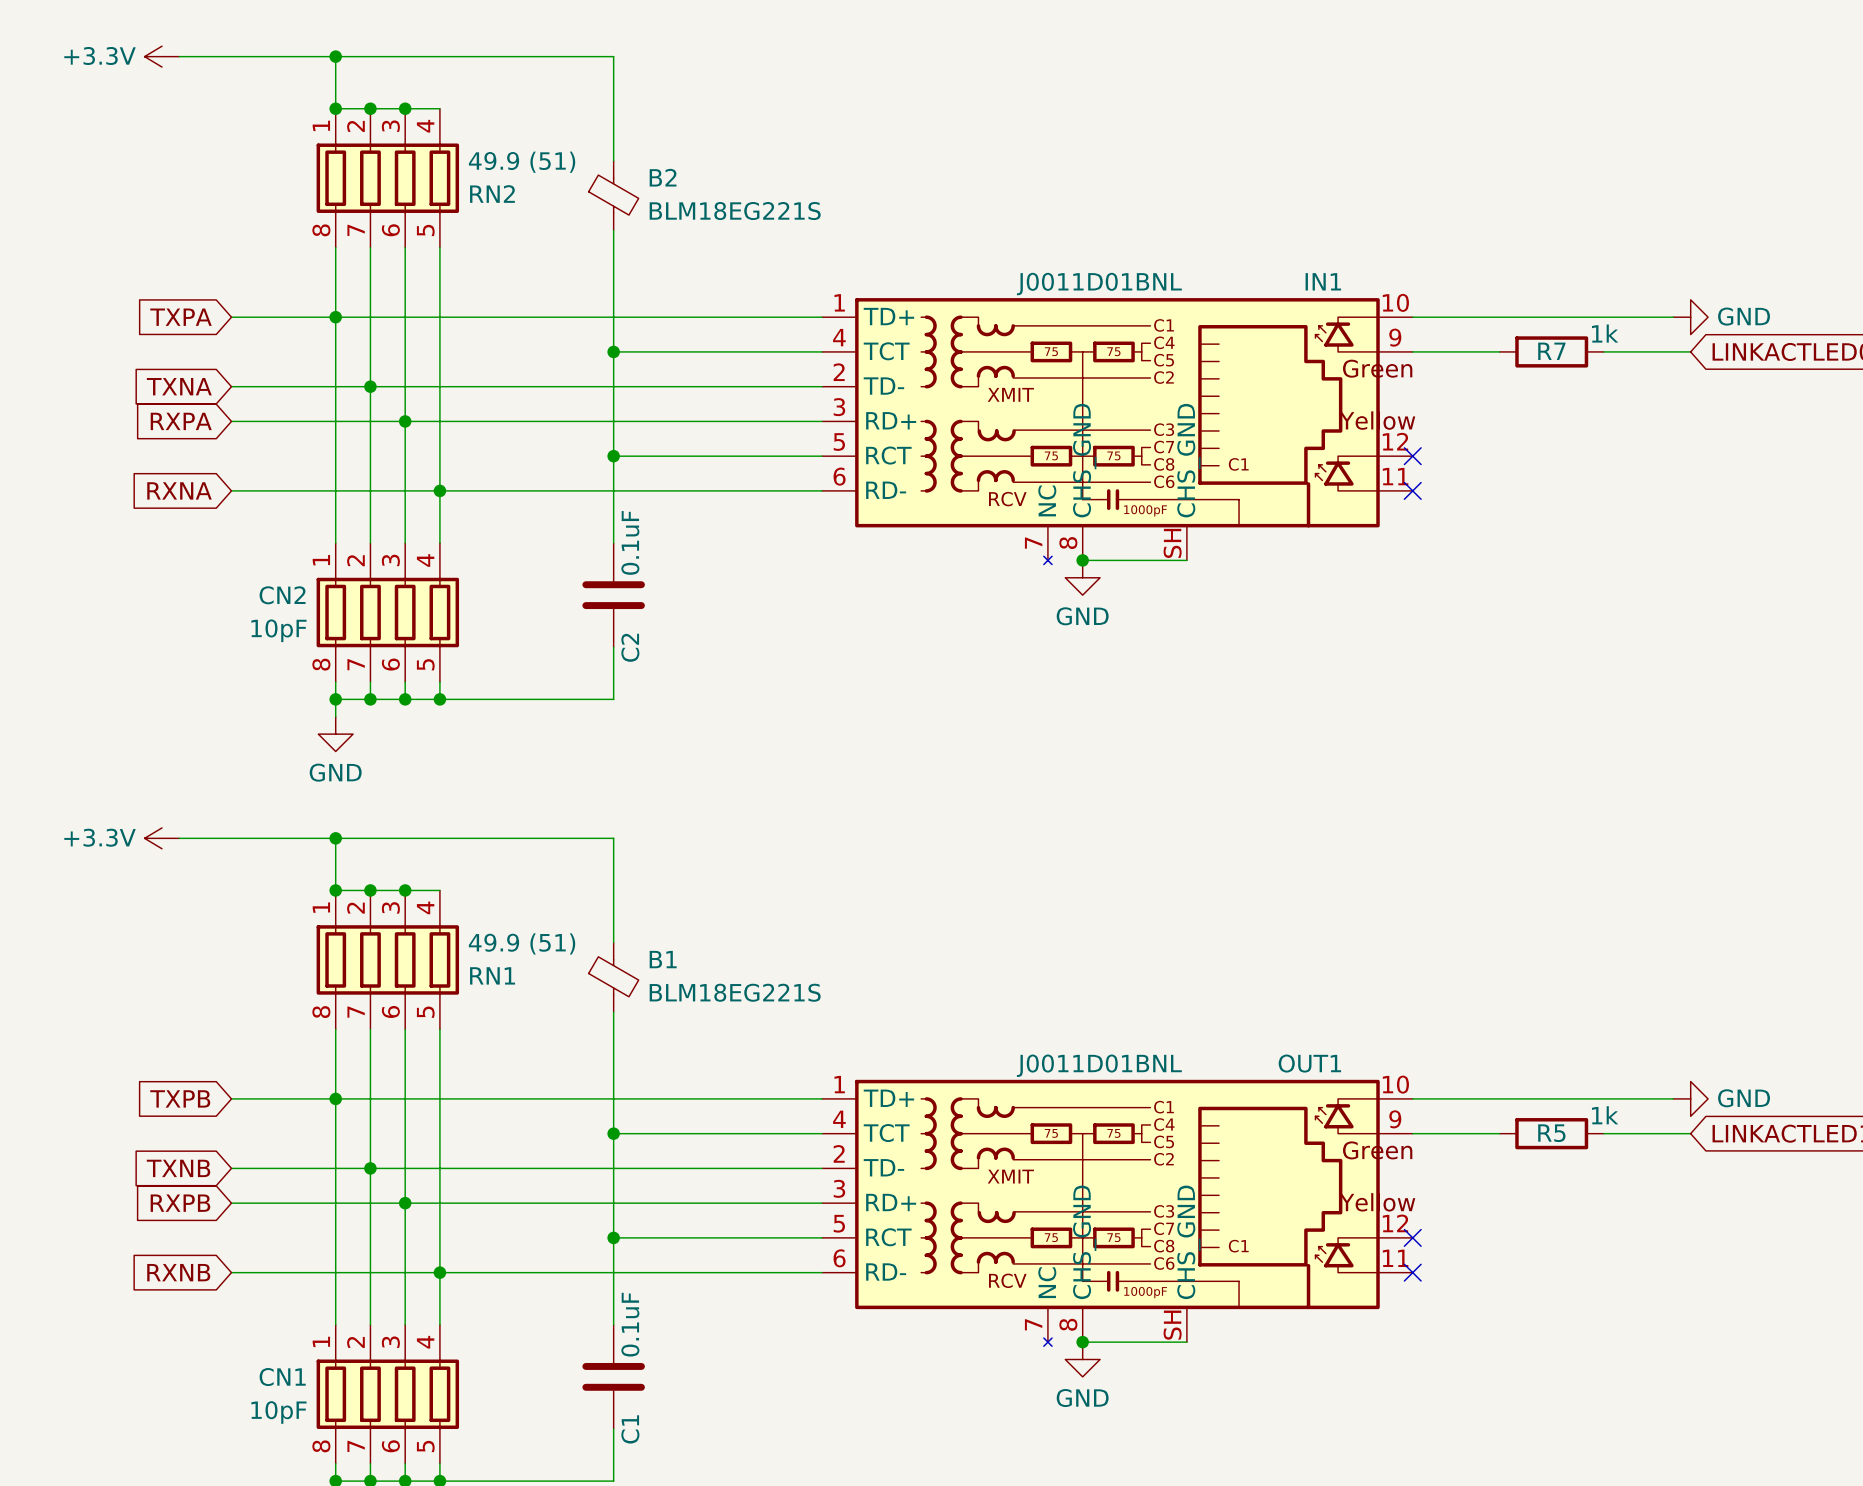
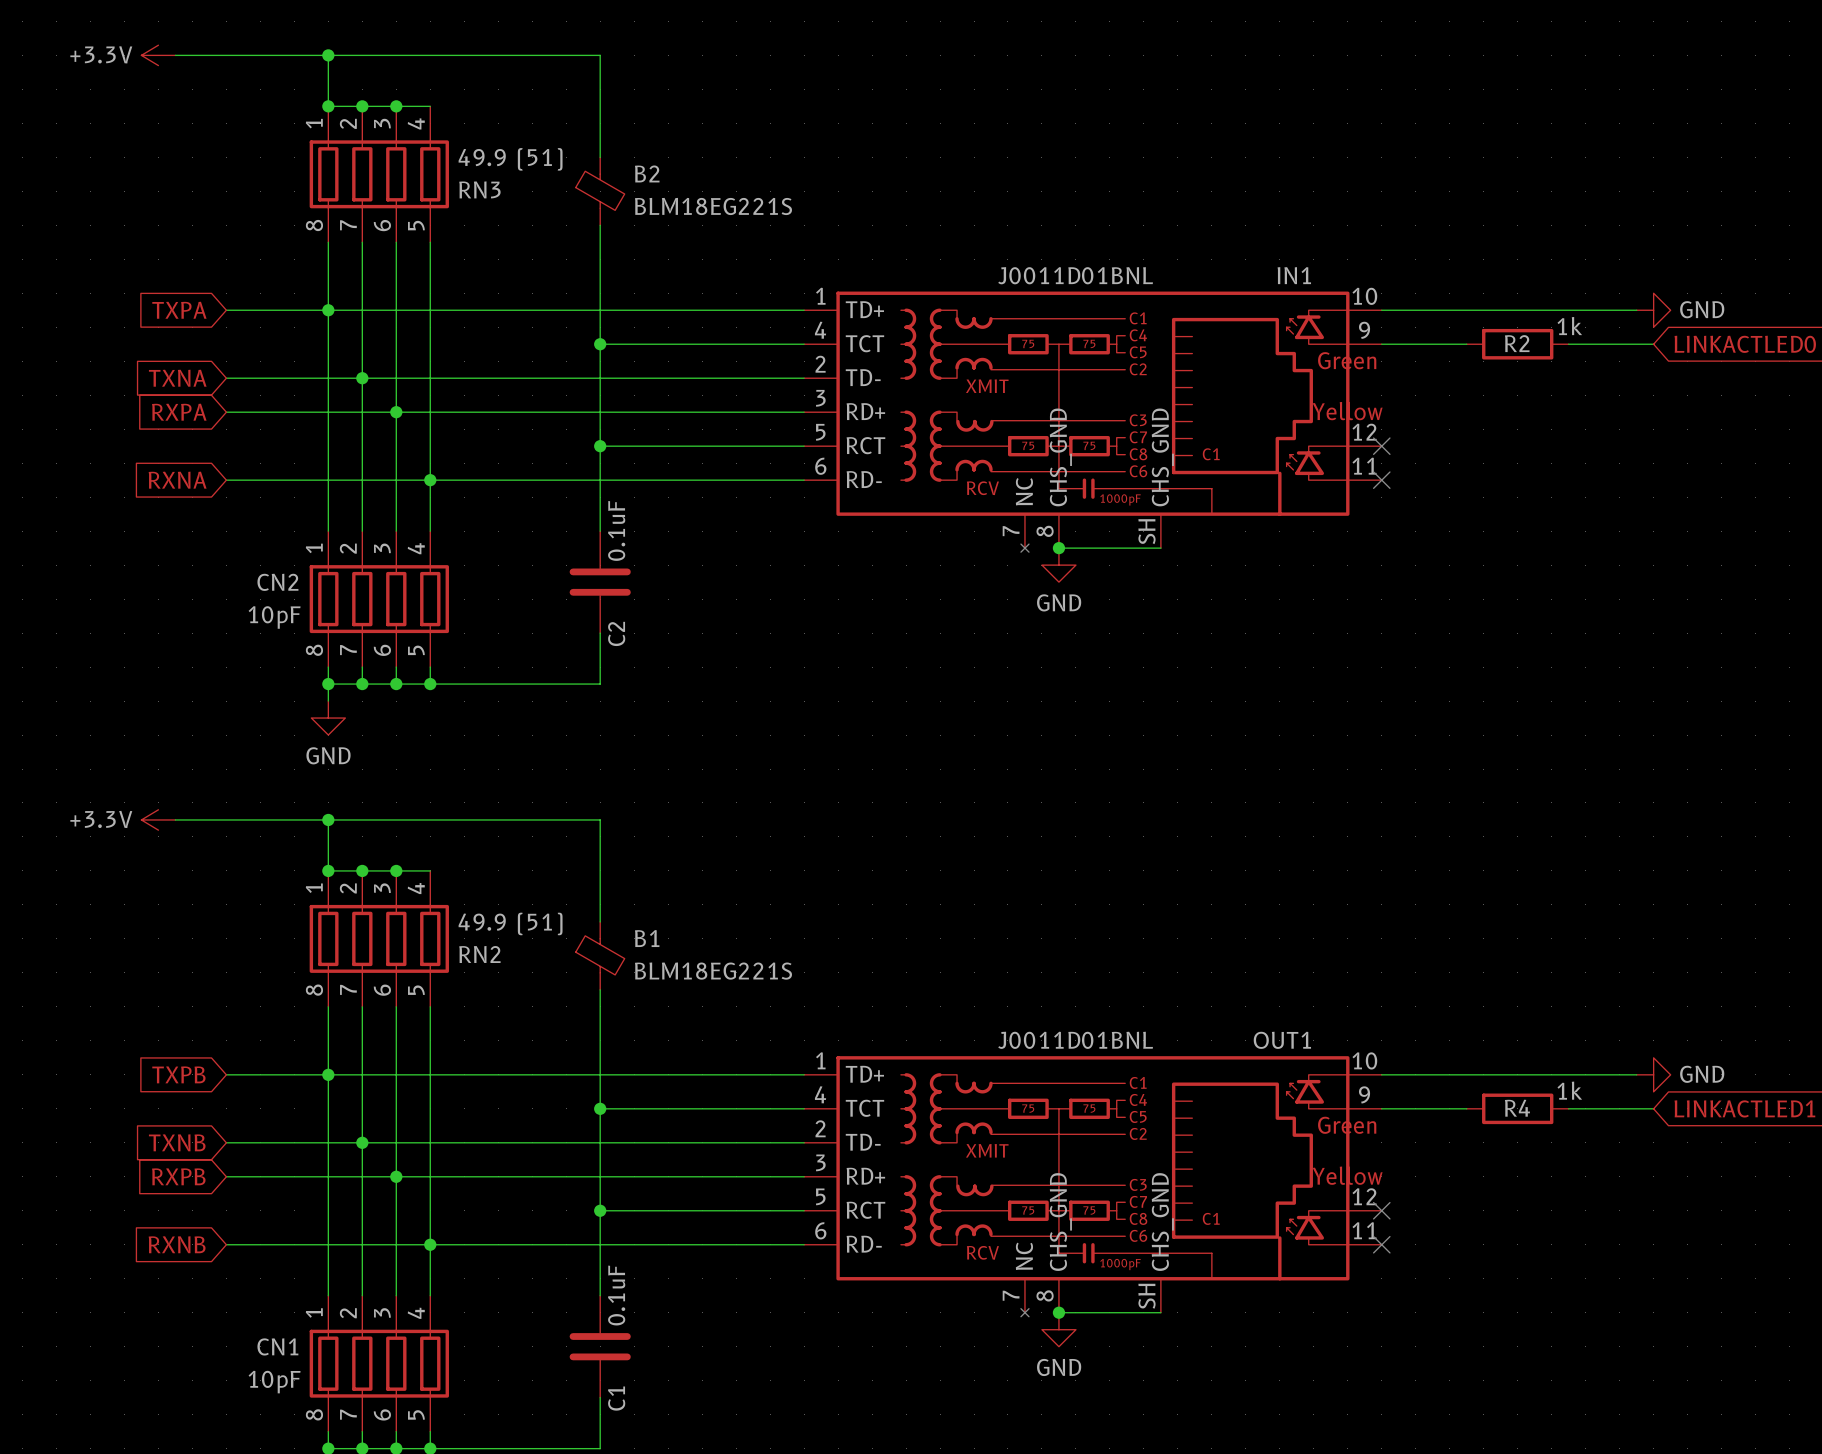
RN2 name: RN2 (492, 194) -> RN3 (479, 189)
R7 name: R7 (1551, 351) -> R2 (1517, 343)
RN1 name: RN1 (492, 975) -> RN2 (479, 954)
R5 name: R5 (1551, 1133) -> R4 (1517, 1108)

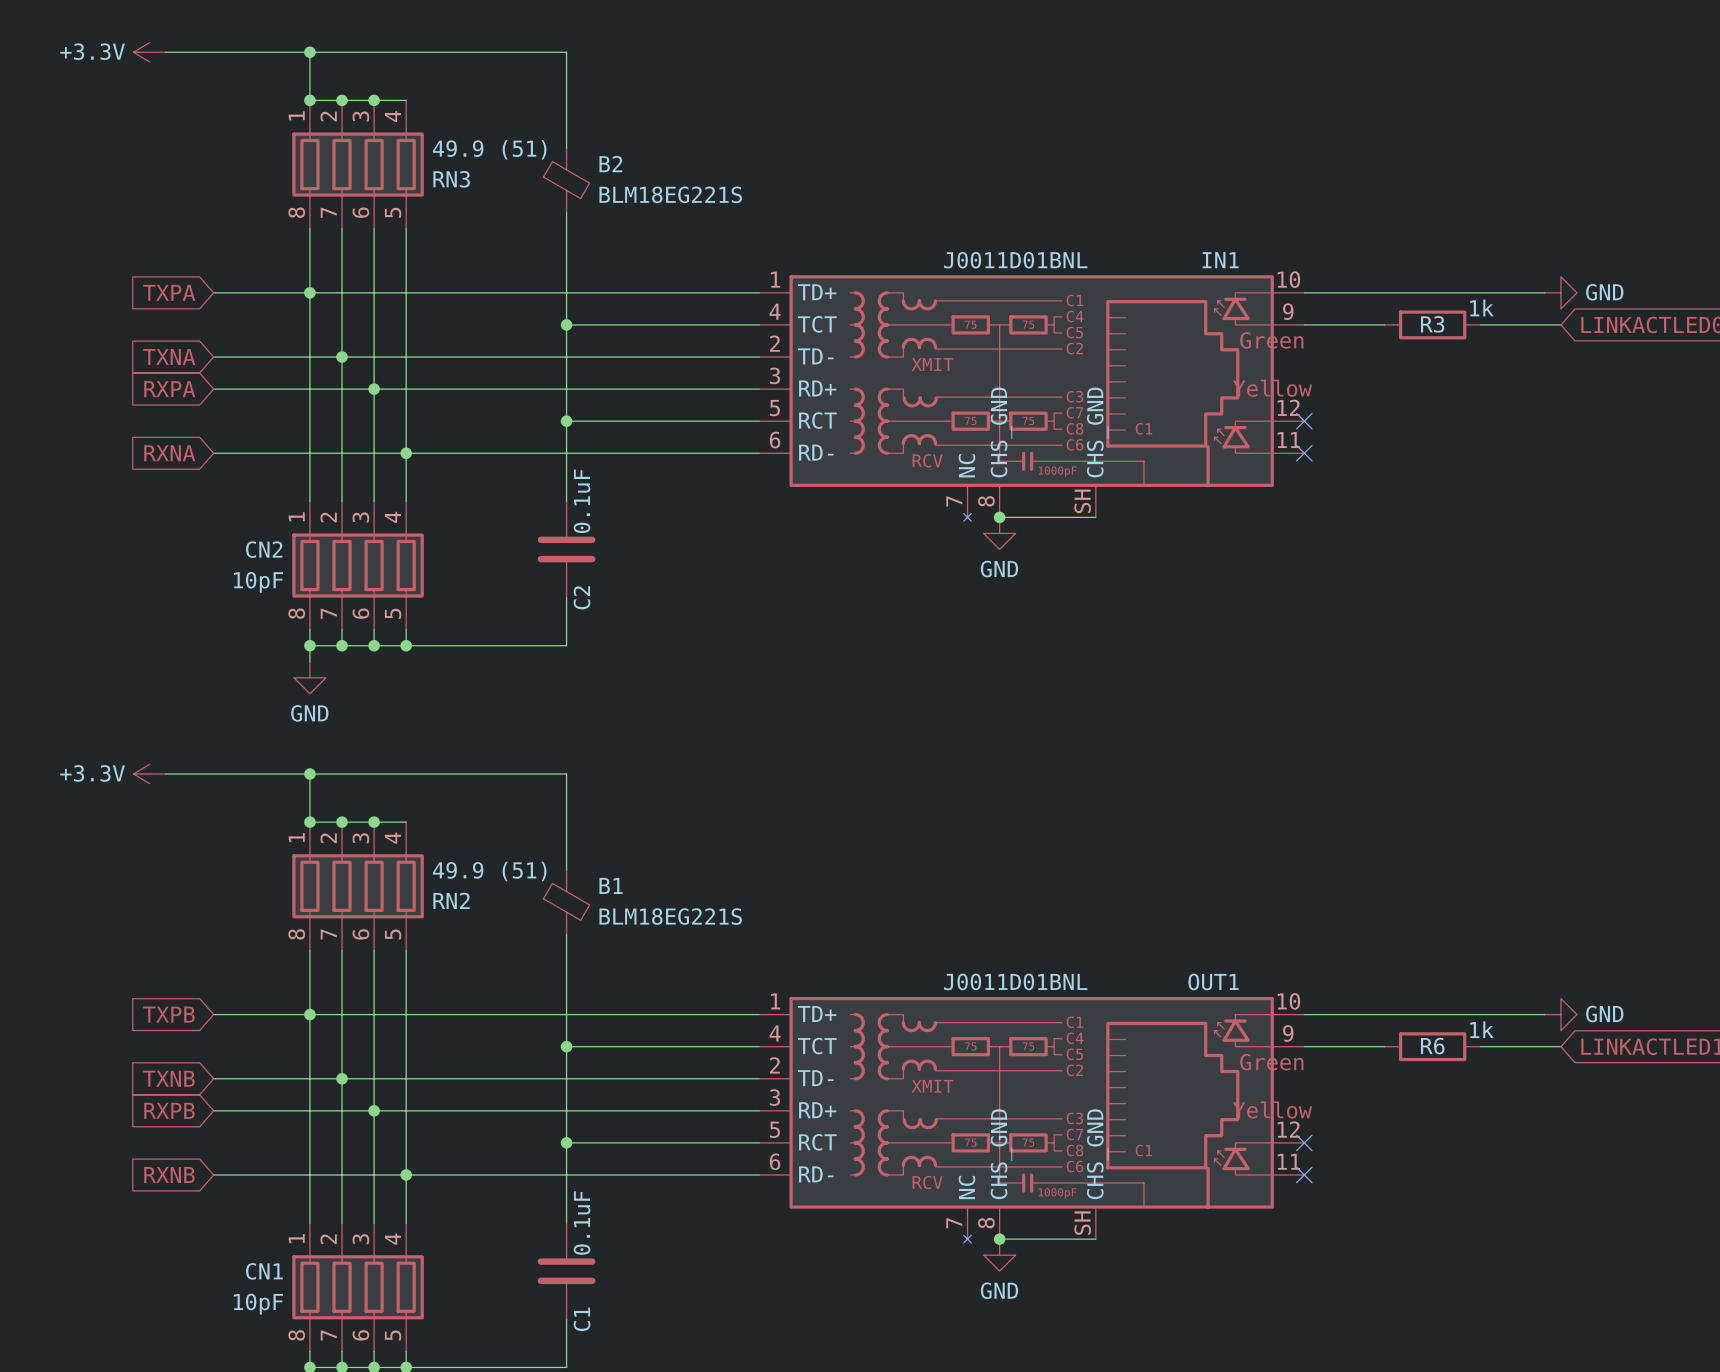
R2 name: R2 (1517, 343) -> R3 (1432, 324)
R4 name: R4 (1517, 1108) -> R6 (1432, 1046)

